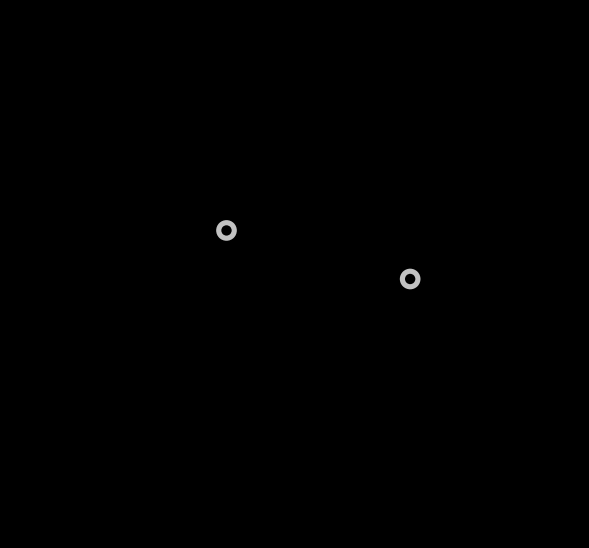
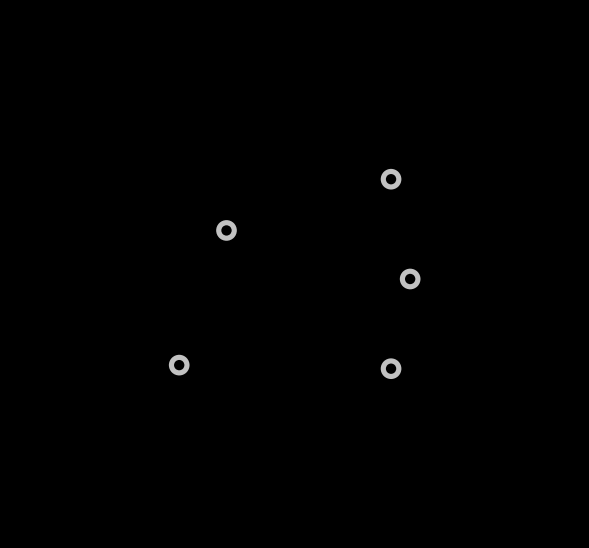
via: none -> (391, 179)
via: none -> (179, 365)
via: none -> (391, 368)

